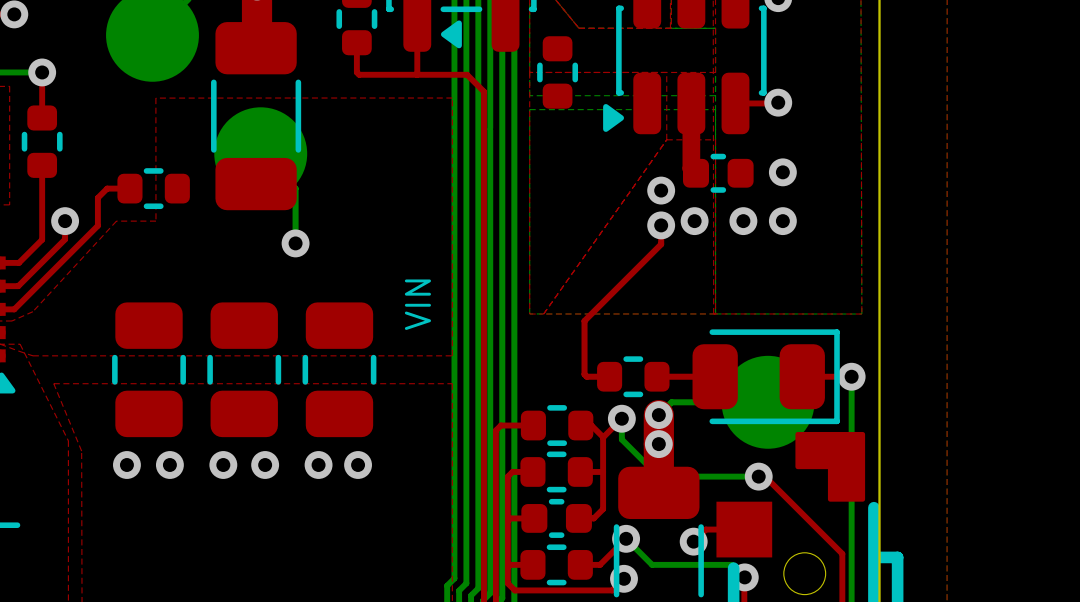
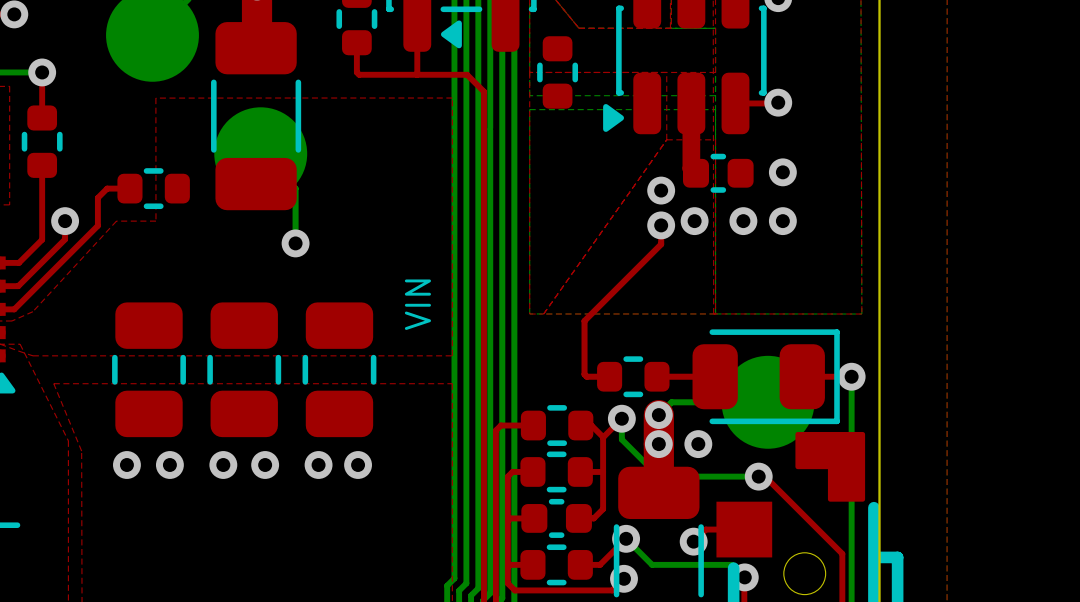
via: none -> (698, 444)

